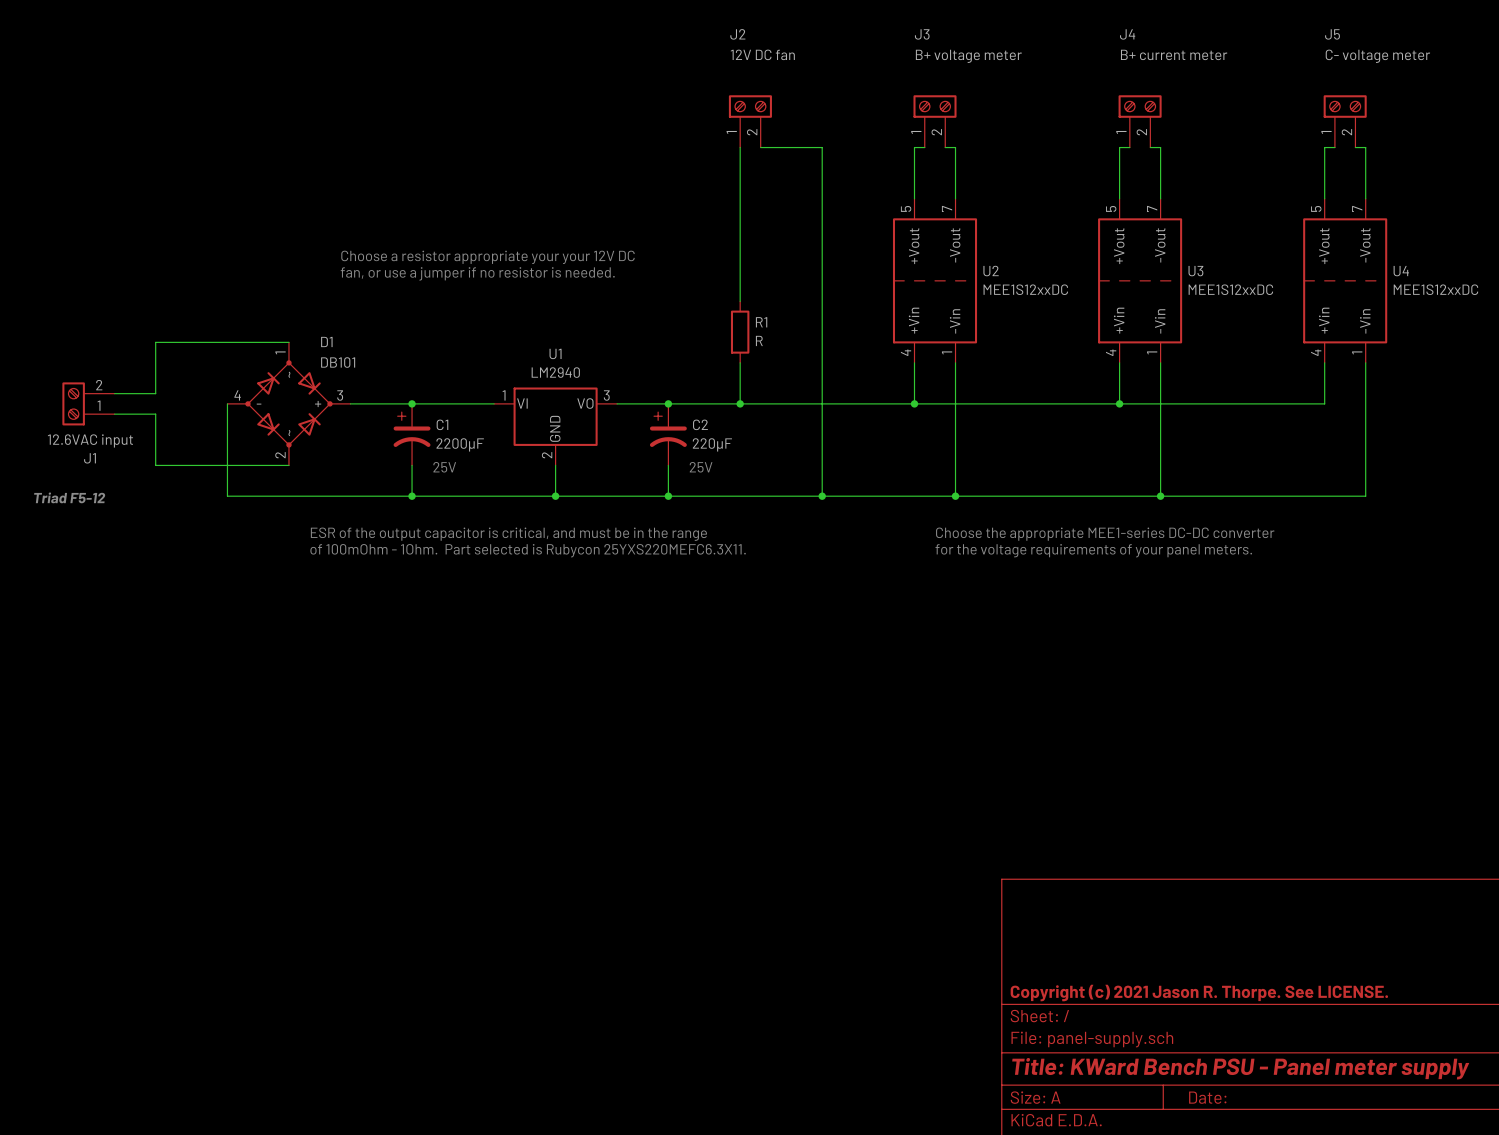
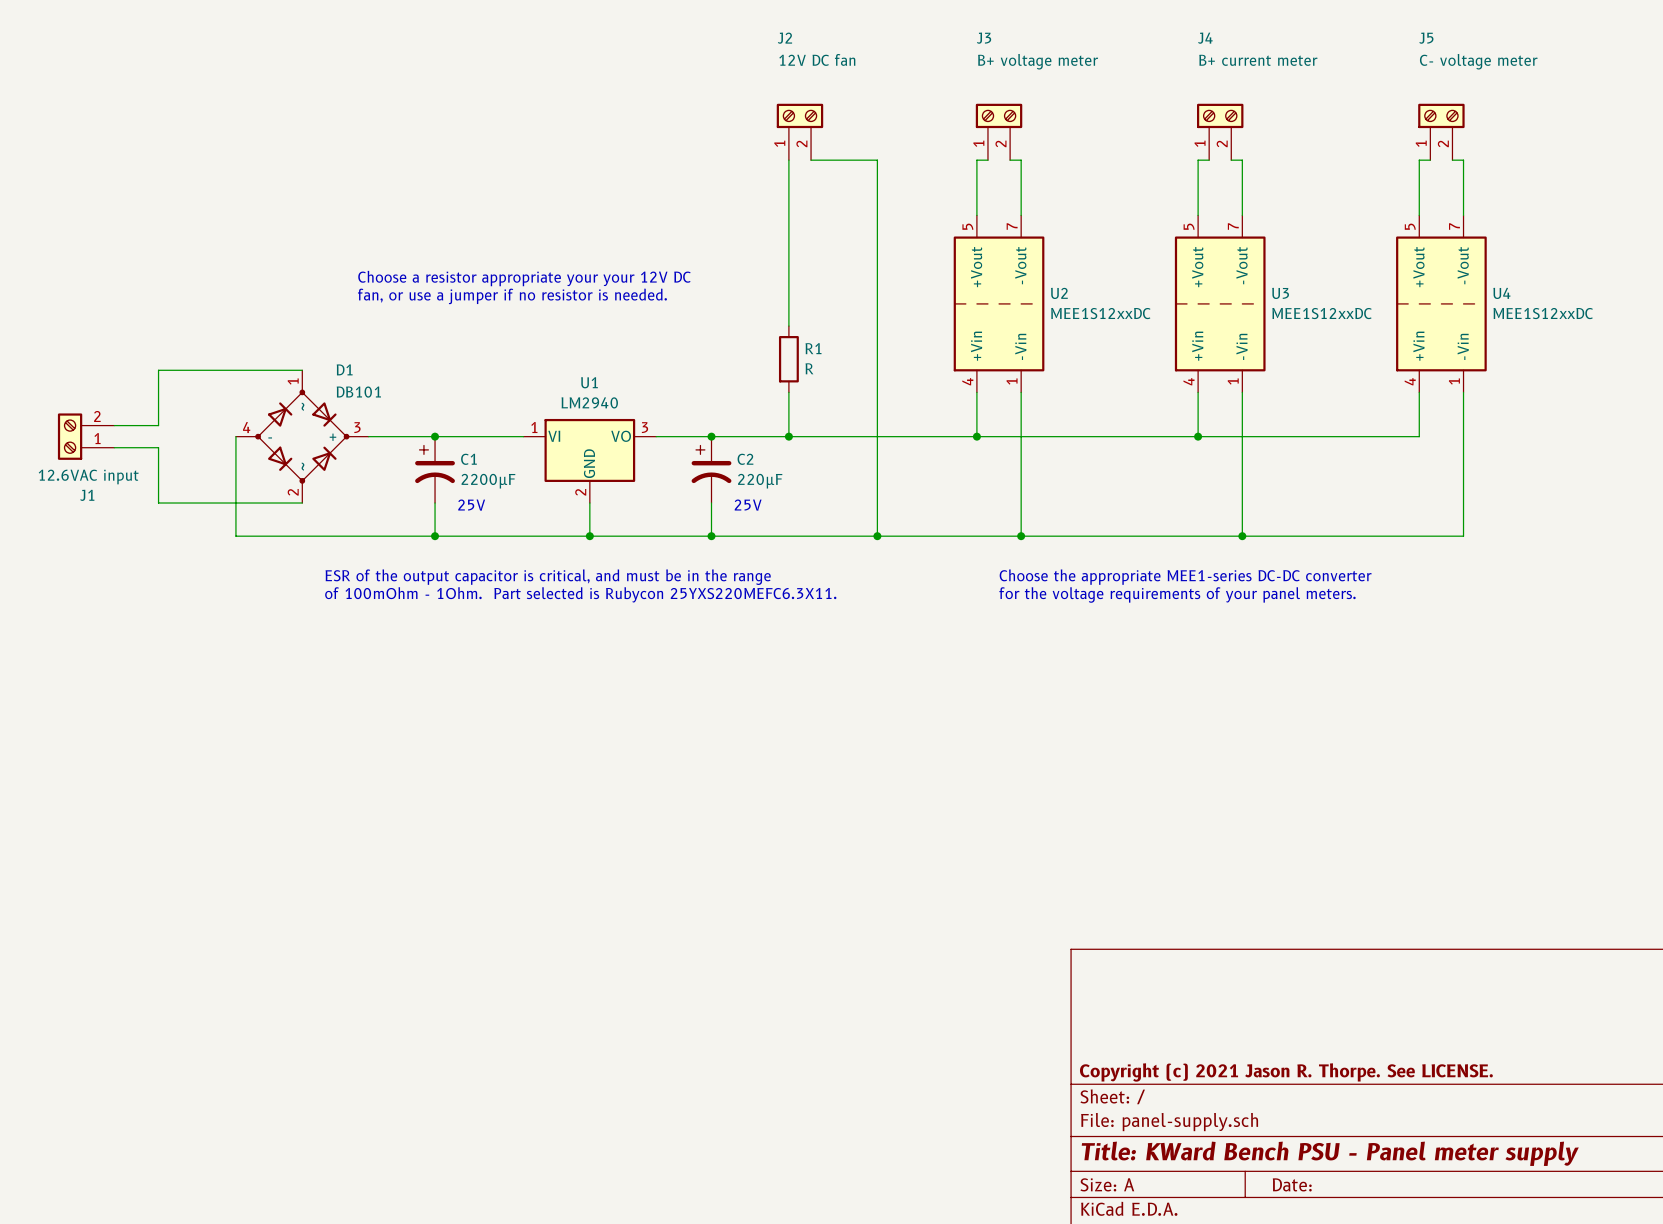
text: Triad F5-12 (69, 497) -> none

